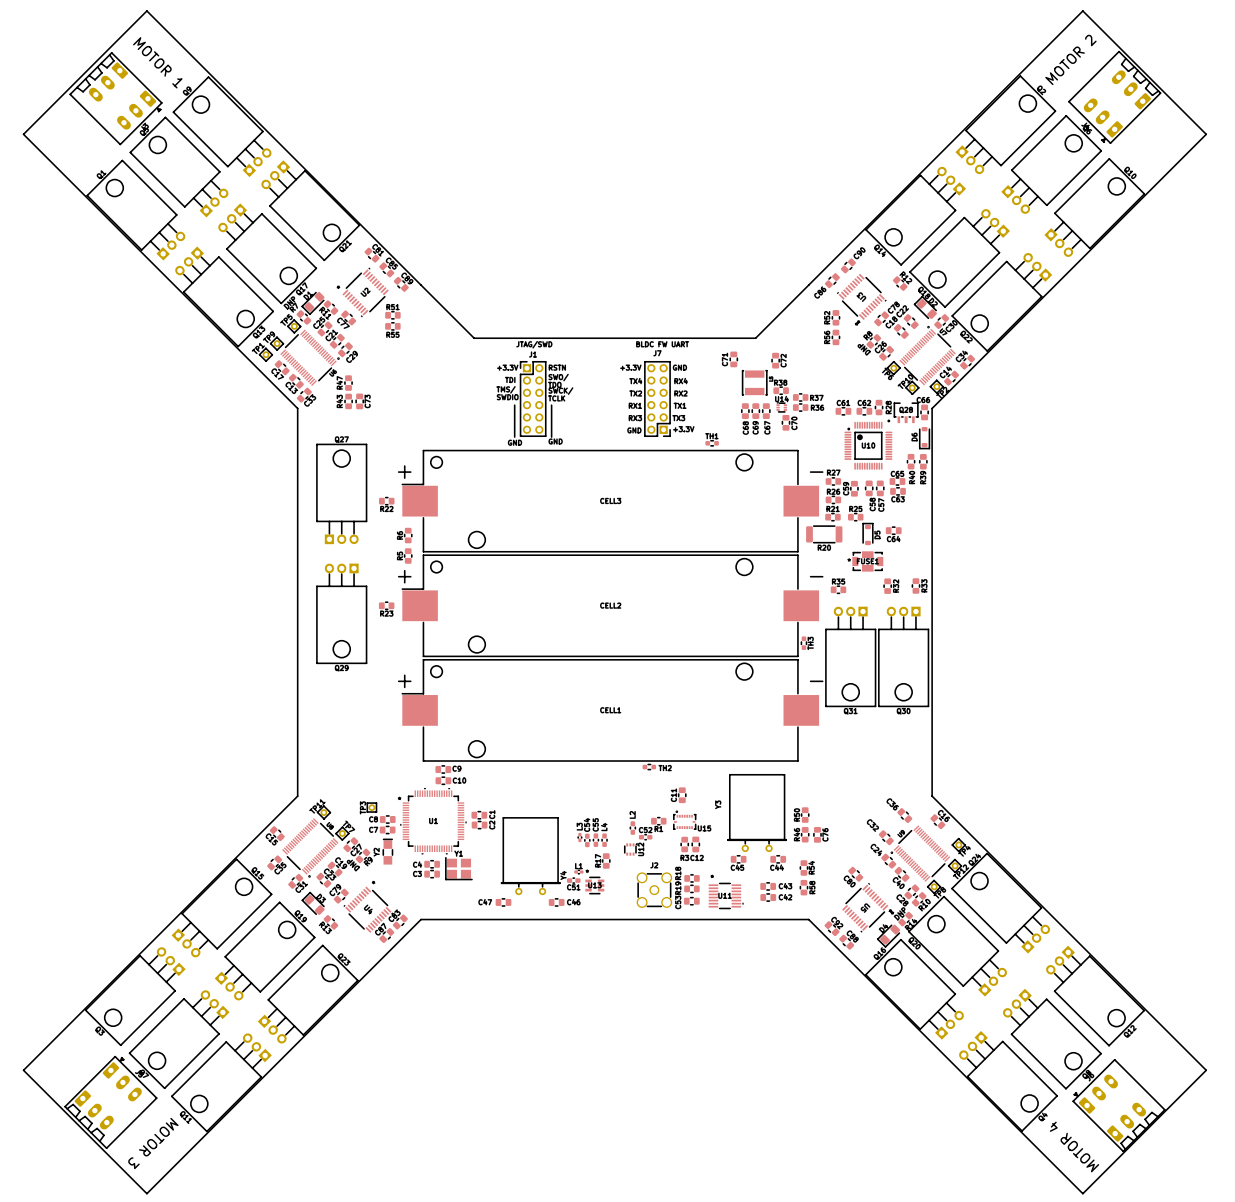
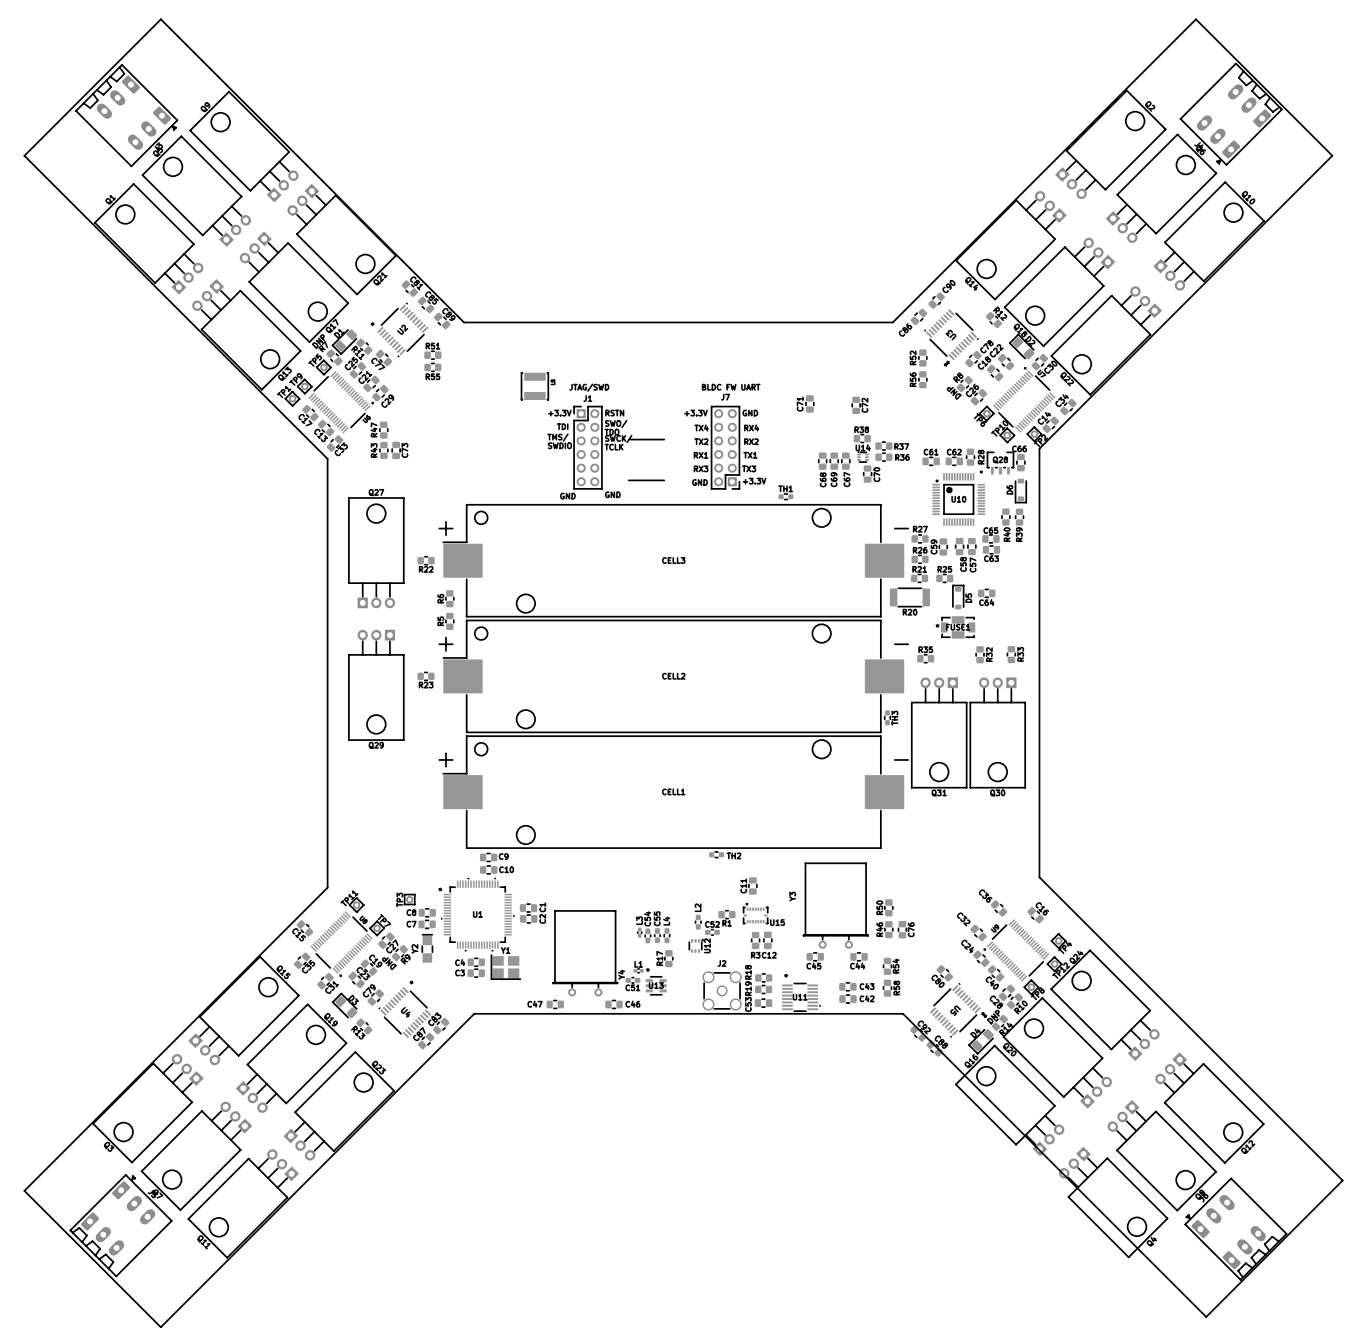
text: MOTOR 2 (1070, 59) -> none
text: MOTOR 1 (157, 62) -> none
part position: (754, 382) -> (534, 386)
line: none -> (628, 439) (664, 439)
line: (514, 405) (514, 437) -> none
line: (551, 405) (551, 437) -> none
board edge: (297, 409) (23, 134) (146, 10) (474, 338) (755, 338) (1082, 10) (1206, 134) (932, 408) (932, 796) (1206, 1070) (1082, 1193) (808, 919) (421, 919) (146, 1193) (23, 1070) (297, 796) -> (327, 458) (24, 155) (160, 19) (464, 322) (892, 322) (1195, 19) (1332, 155) (1039, 448) (1039, 877) (1342, 1180) (1206, 1316) (903, 1013) (474, 1013) (160, 1327) (24, 1190) (327, 886)
line: none -> (628, 480) (664, 480)
text: MOTOR 3 (153, 1143) -> none
text: MOTOR 4 (1074, 1146) -> none

